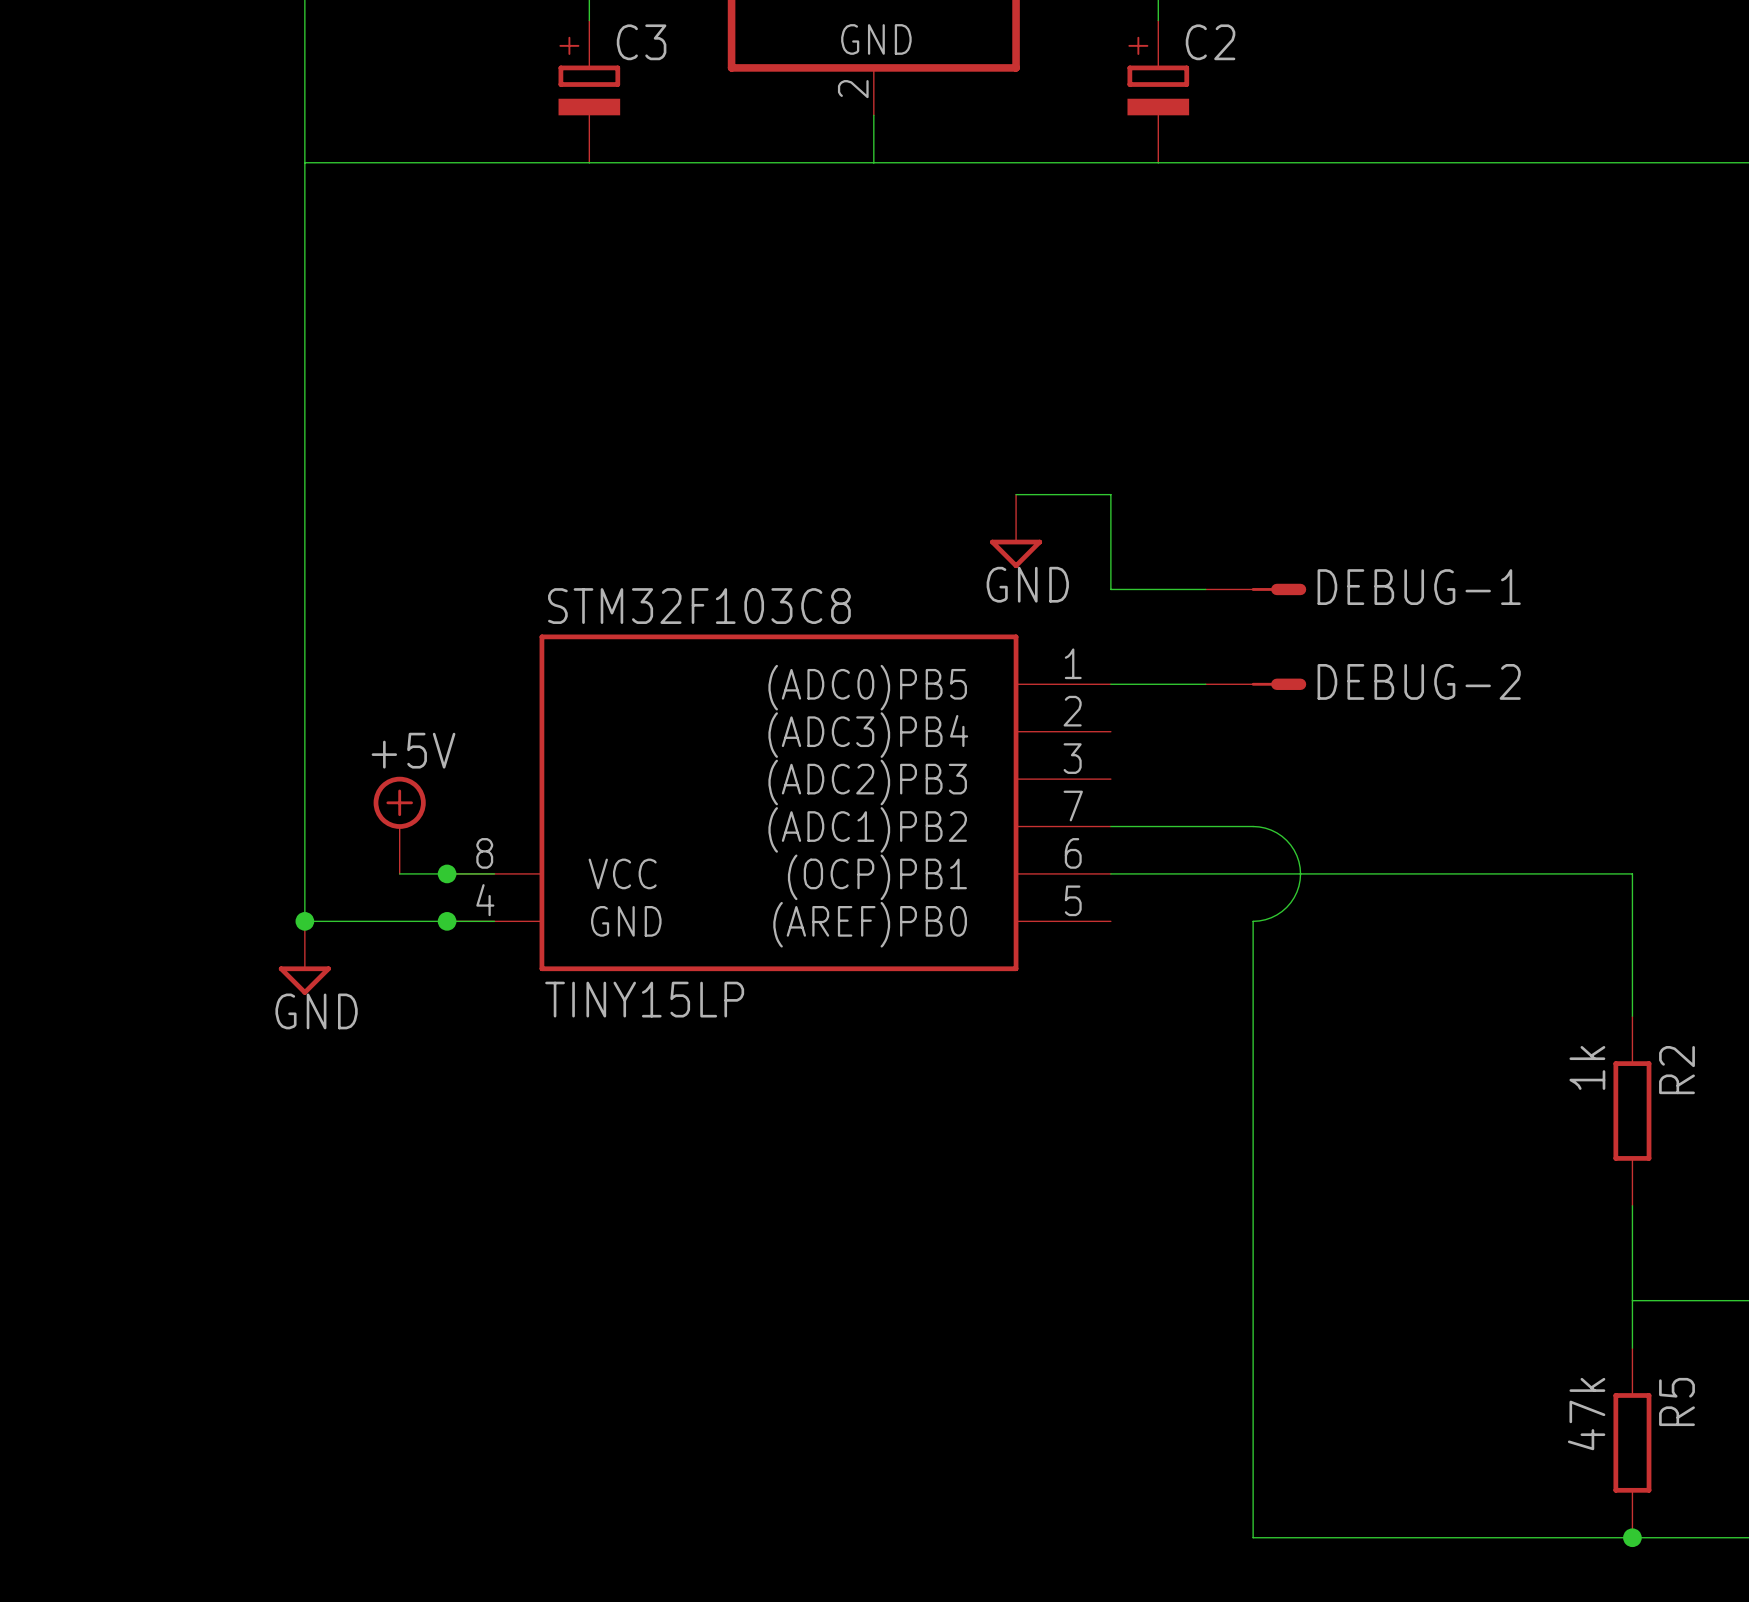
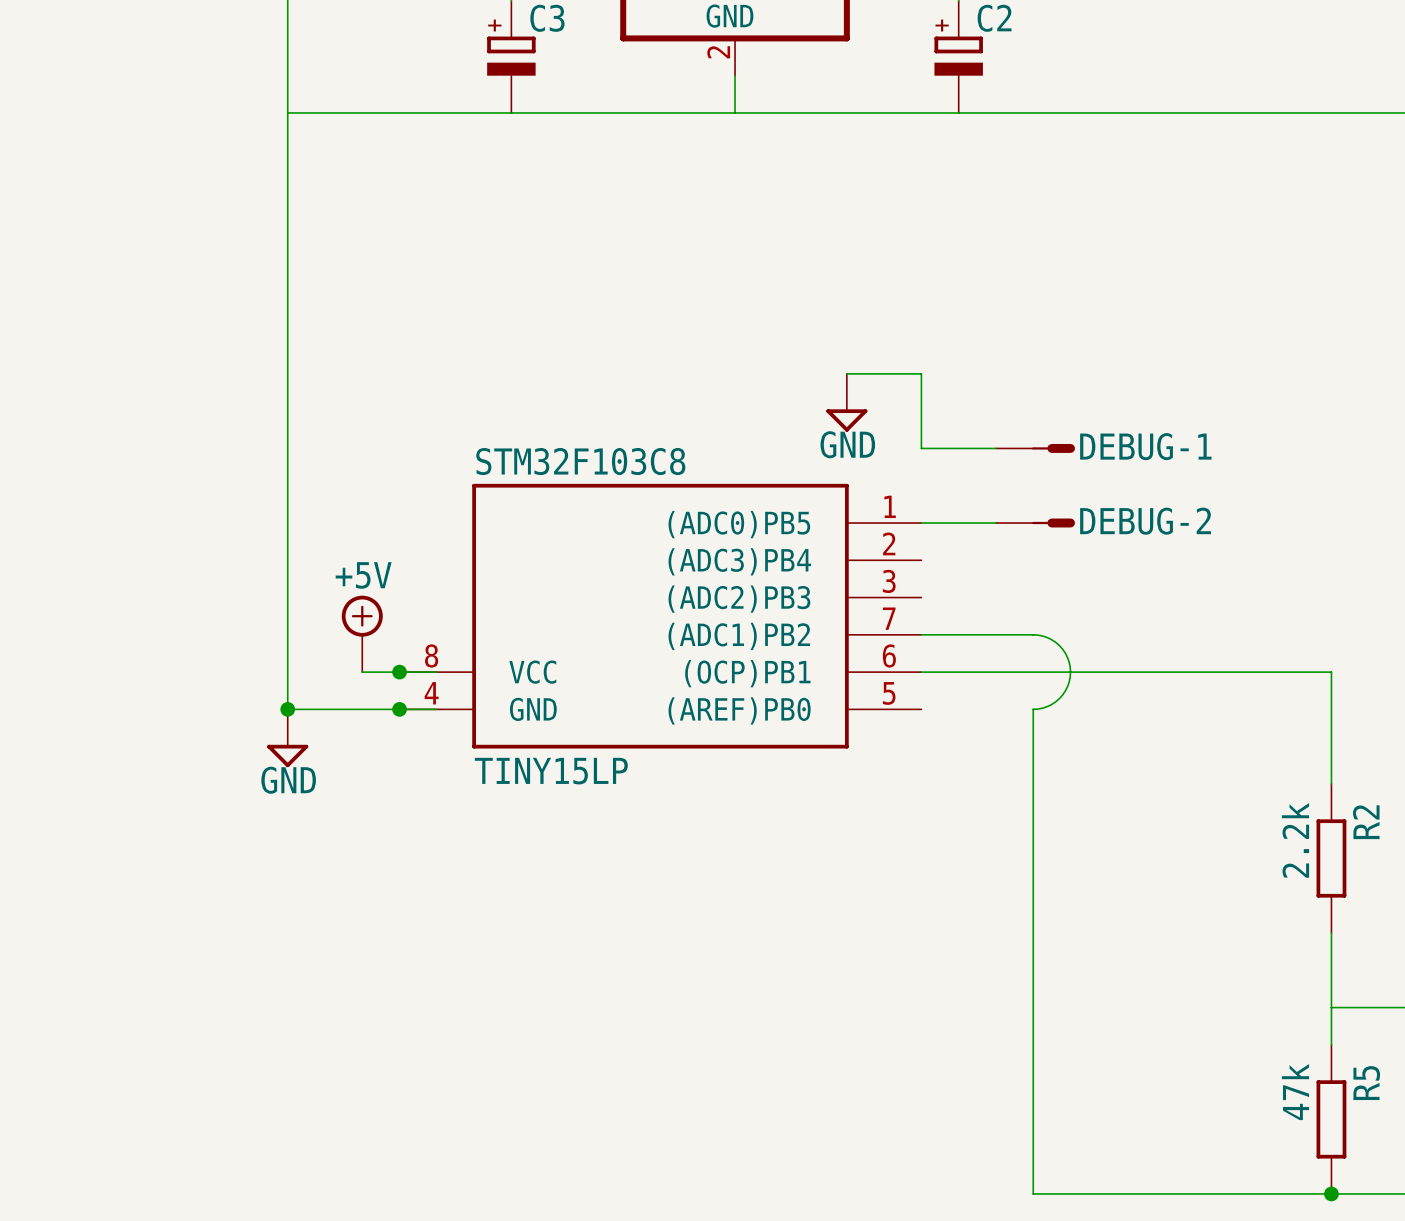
R2 value: 1k (1587, 1067) -> 2.2k (1295, 840)

